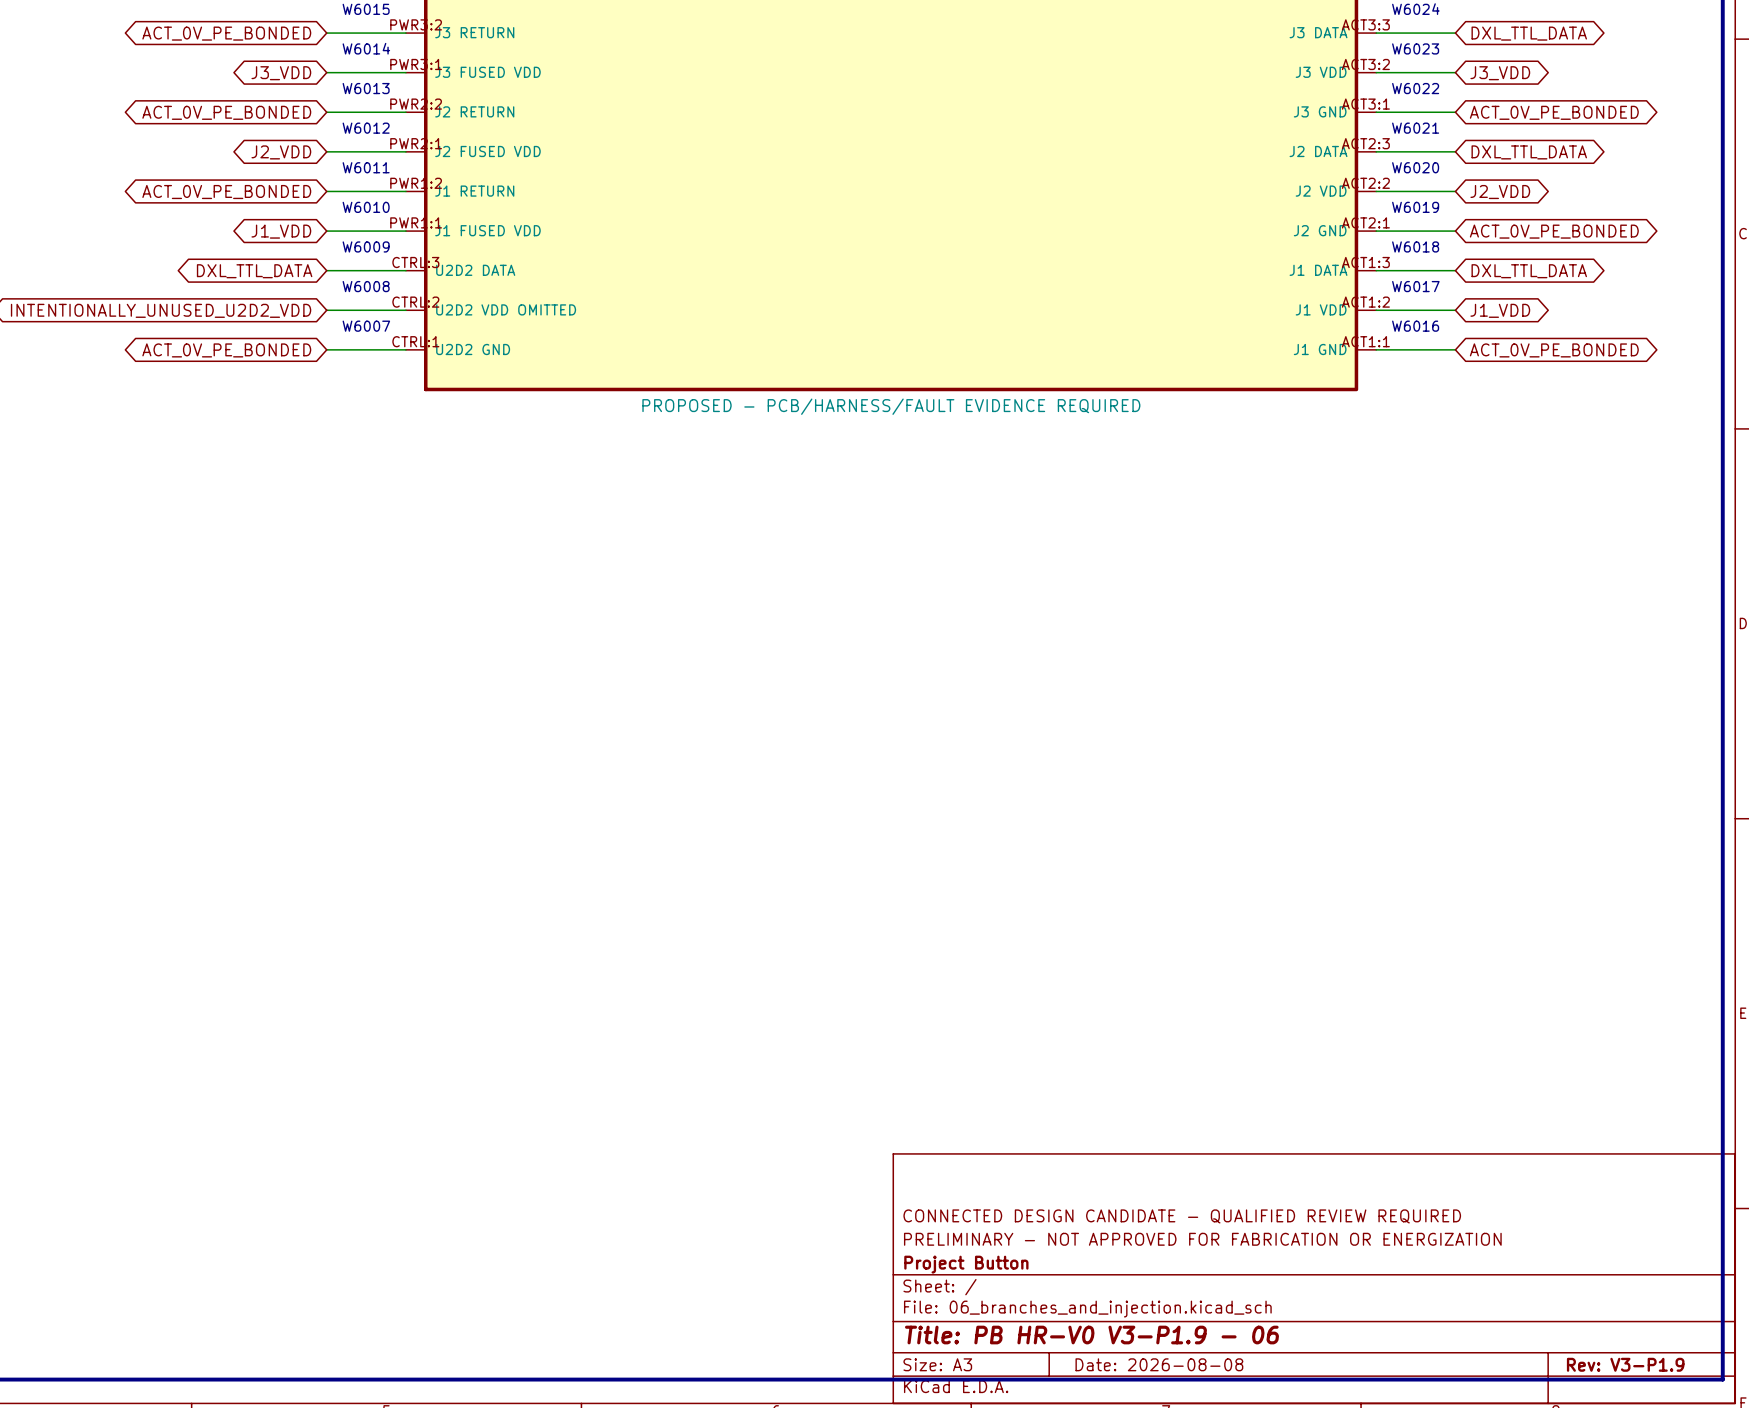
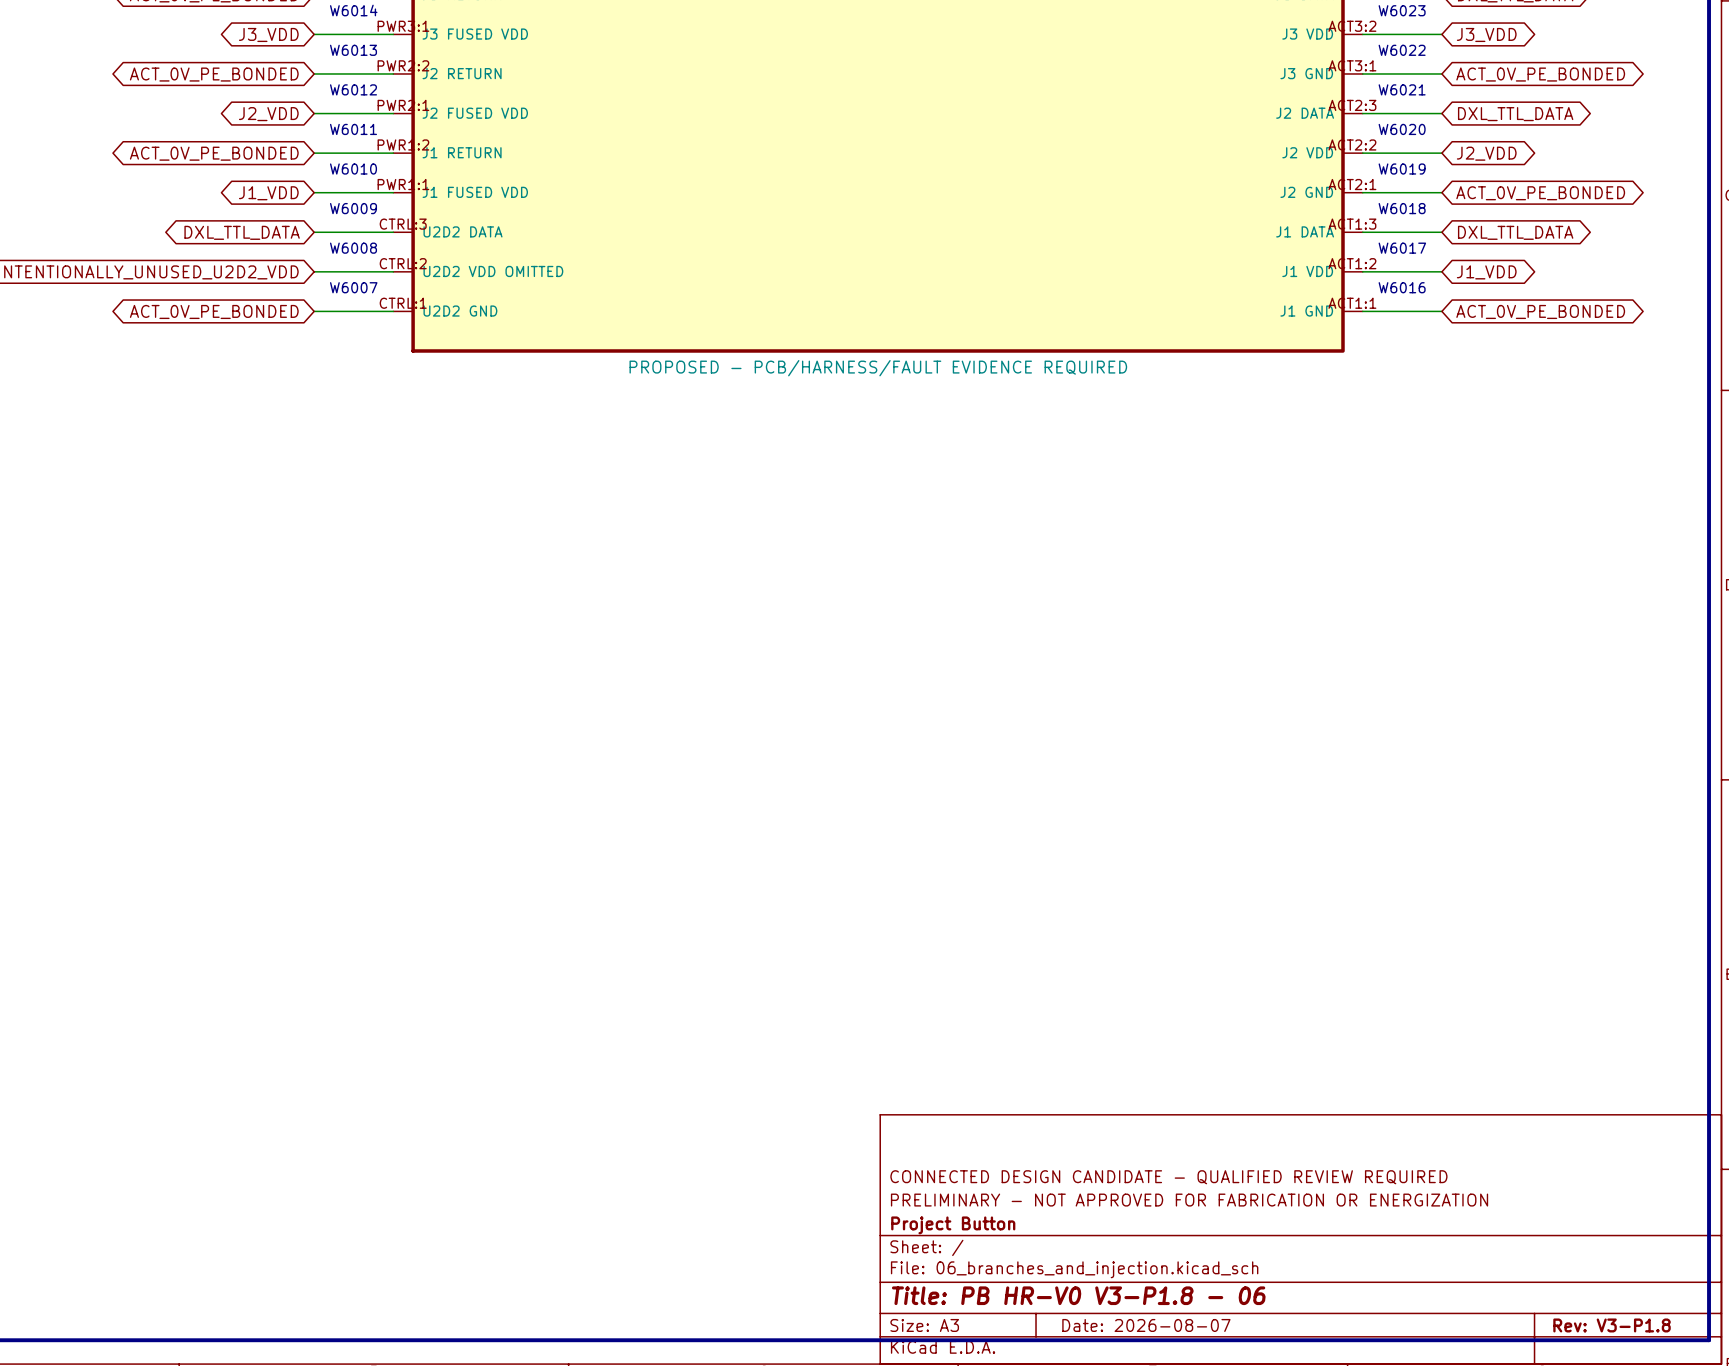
title block: Title: PB HR-V0 V3-P1.9 - 06 (1091, 1335) -> Title: PB HR-V0 V3-P1.8 - 06 (1078, 1295)
title block: Date: 2026-08-08 (1159, 1364) -> Date: 2026-08-07 (1146, 1325)
title block: Rev: V3-P1.9 (1625, 1364) -> Rev: V3-P1.8 (1612, 1325)

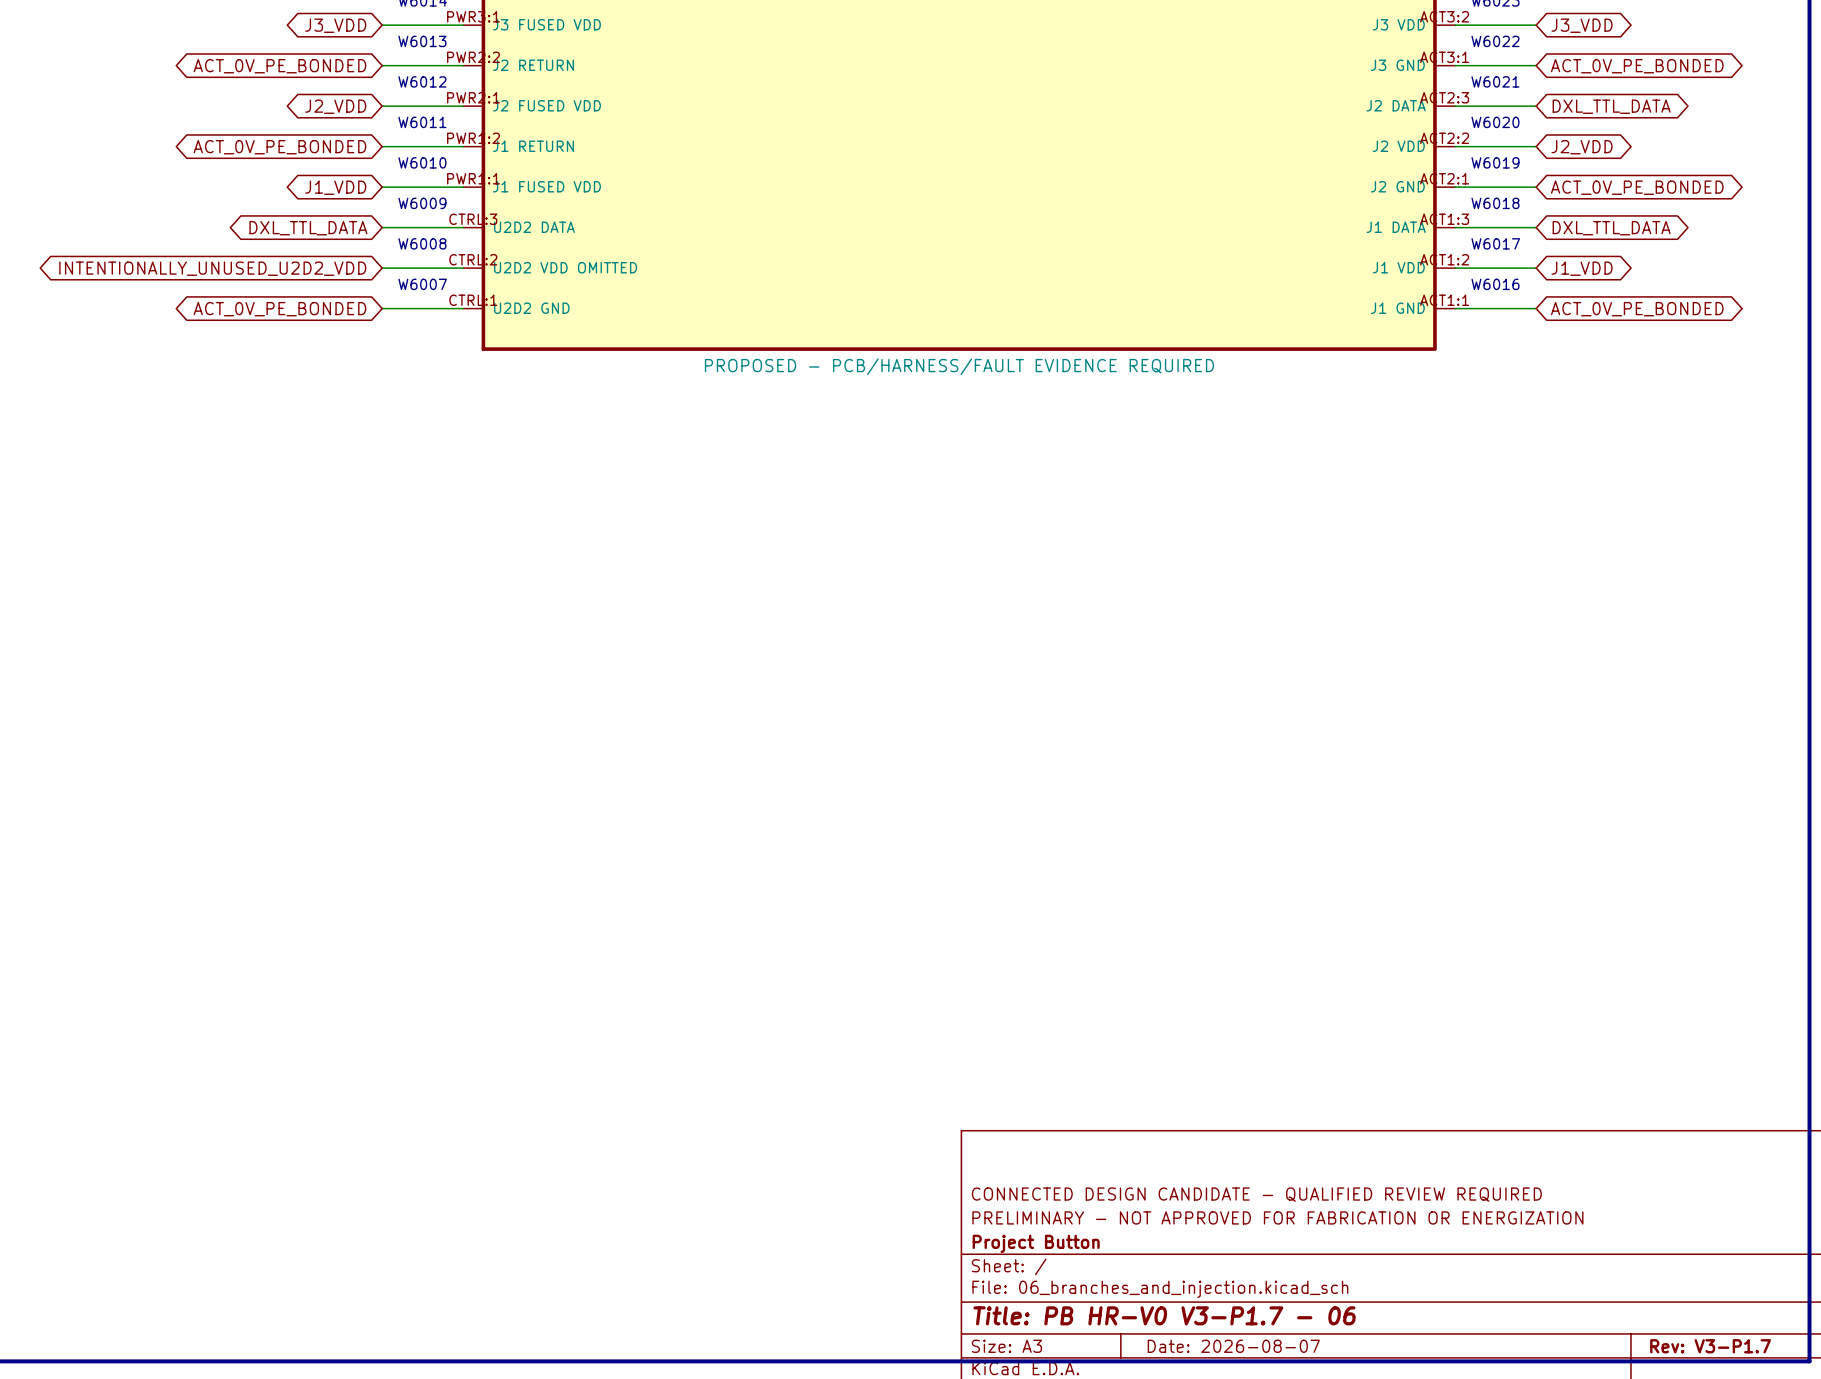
title block: Title: PB HR-V0 V3-P1.8 - 06 (1078, 1295) -> Title: PB HR-V0 V3-P1.7 - 06 (1164, 1315)
title block: Rev: V3-P1.8 (1612, 1325) -> Rev: V3-P1.7 (1710, 1346)

